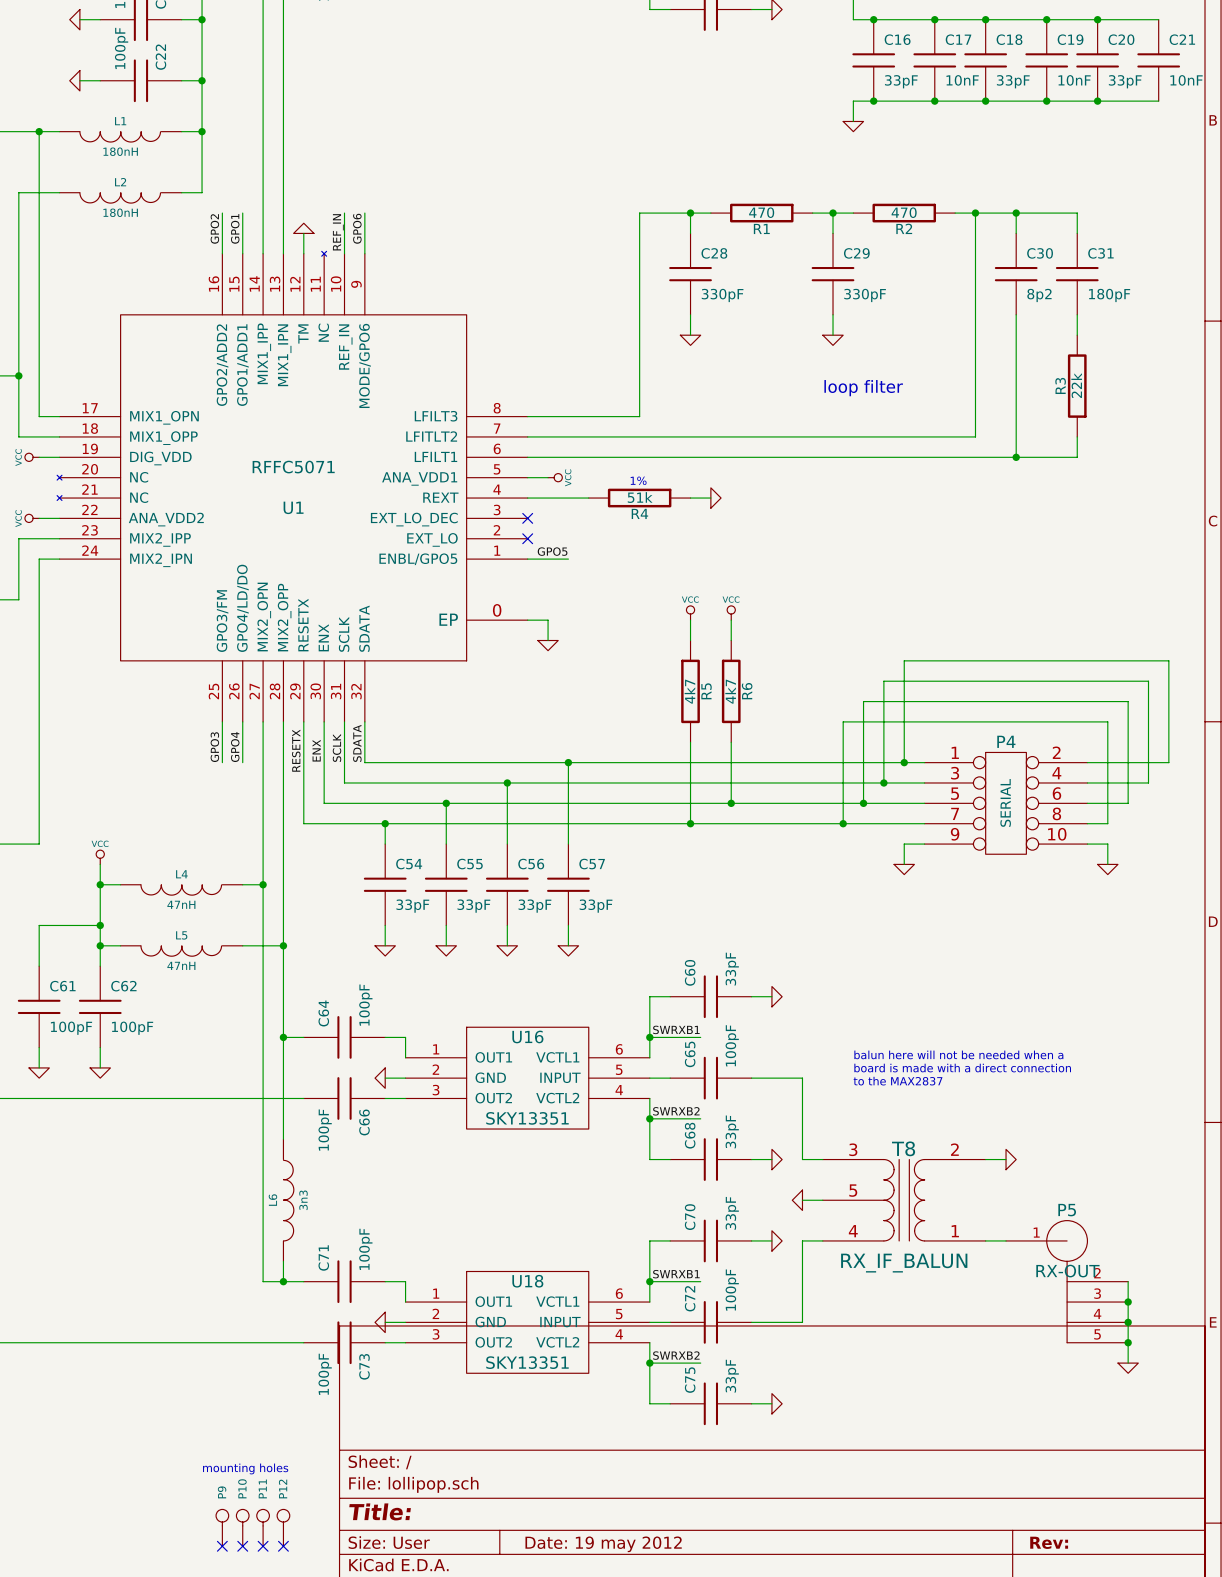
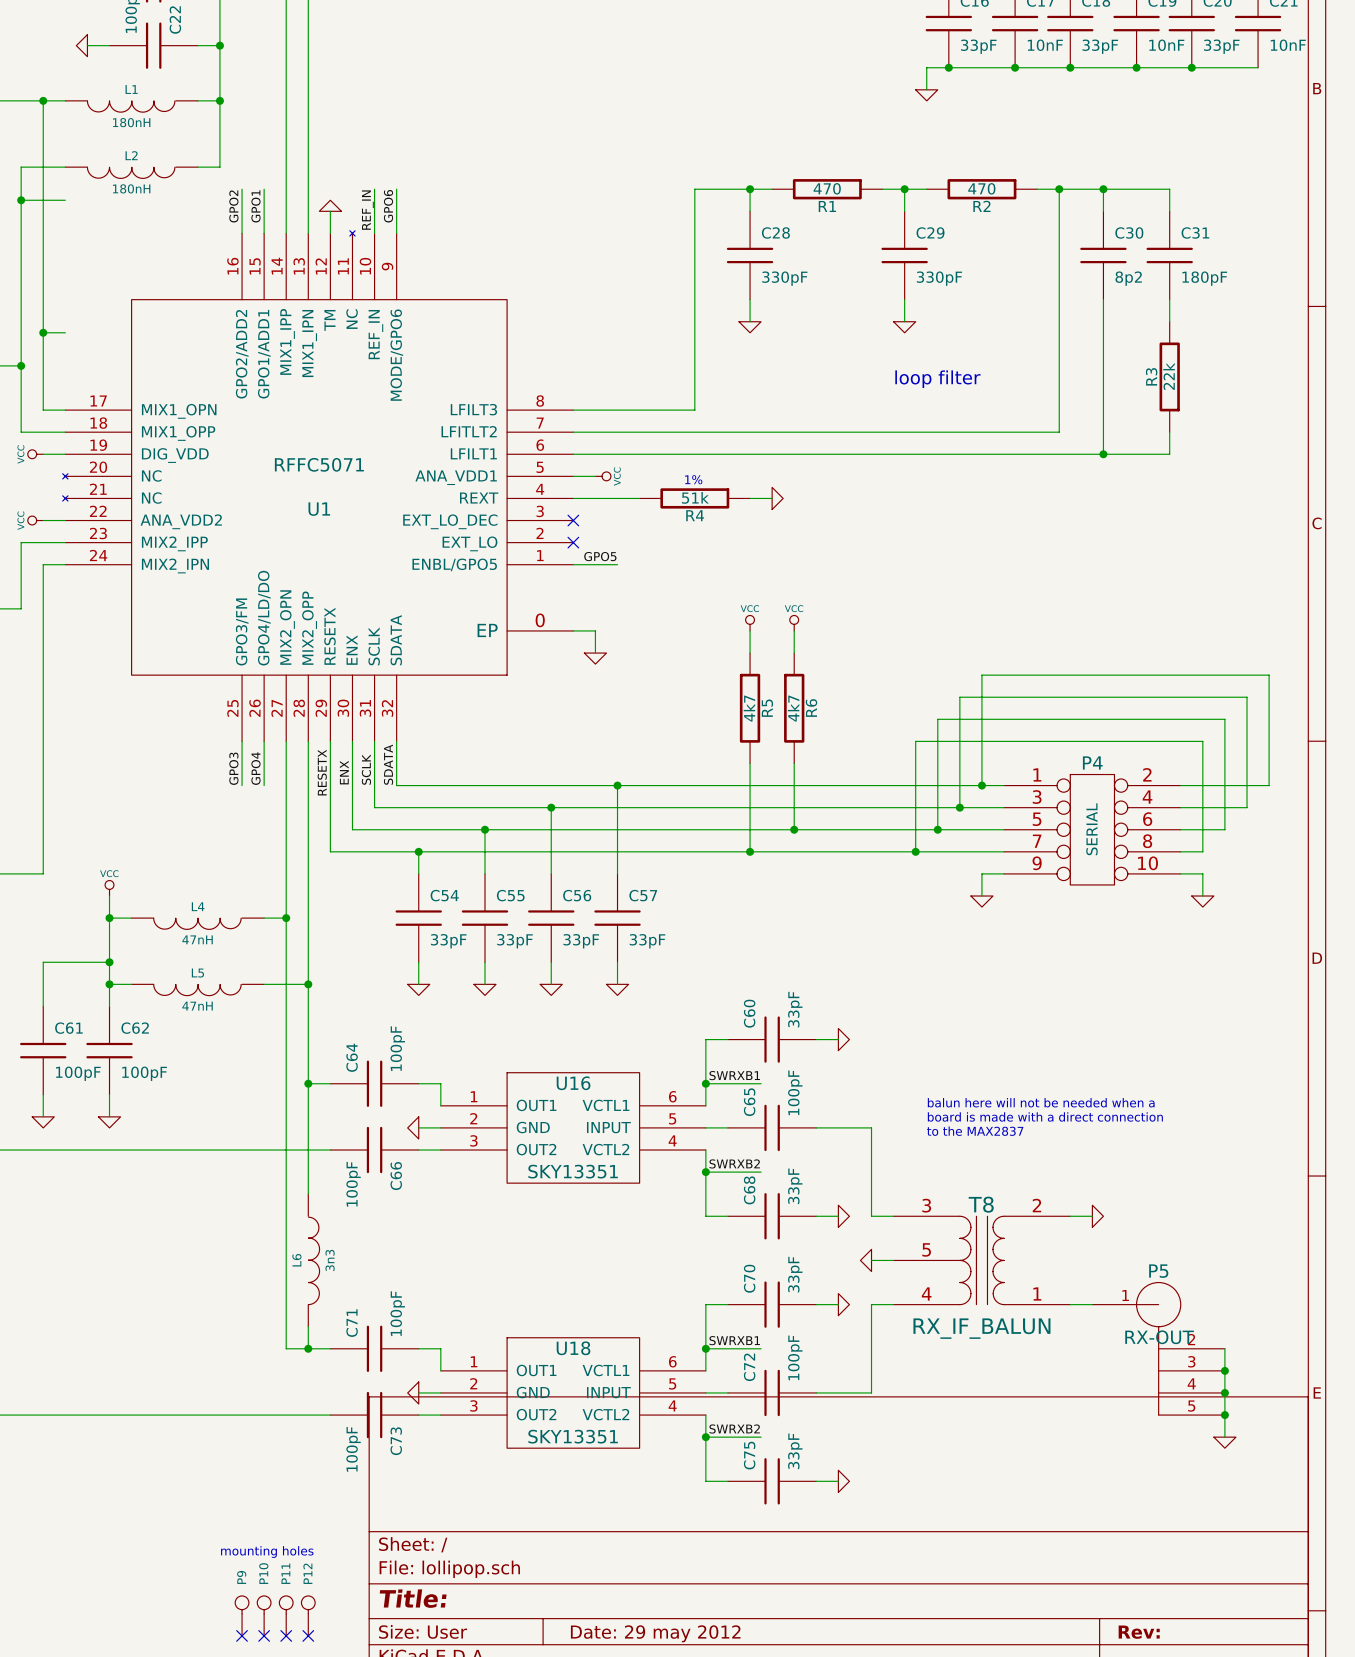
wire: none -> (21, 200) (65, 200)
junction: none -> (21, 200)
wire: none -> (43, 332) (65, 332)
junction: none -> (43, 332)
title block: Date: 19 may 2012 (603, 1544) -> Date: 29 may 2012 (655, 1633)

